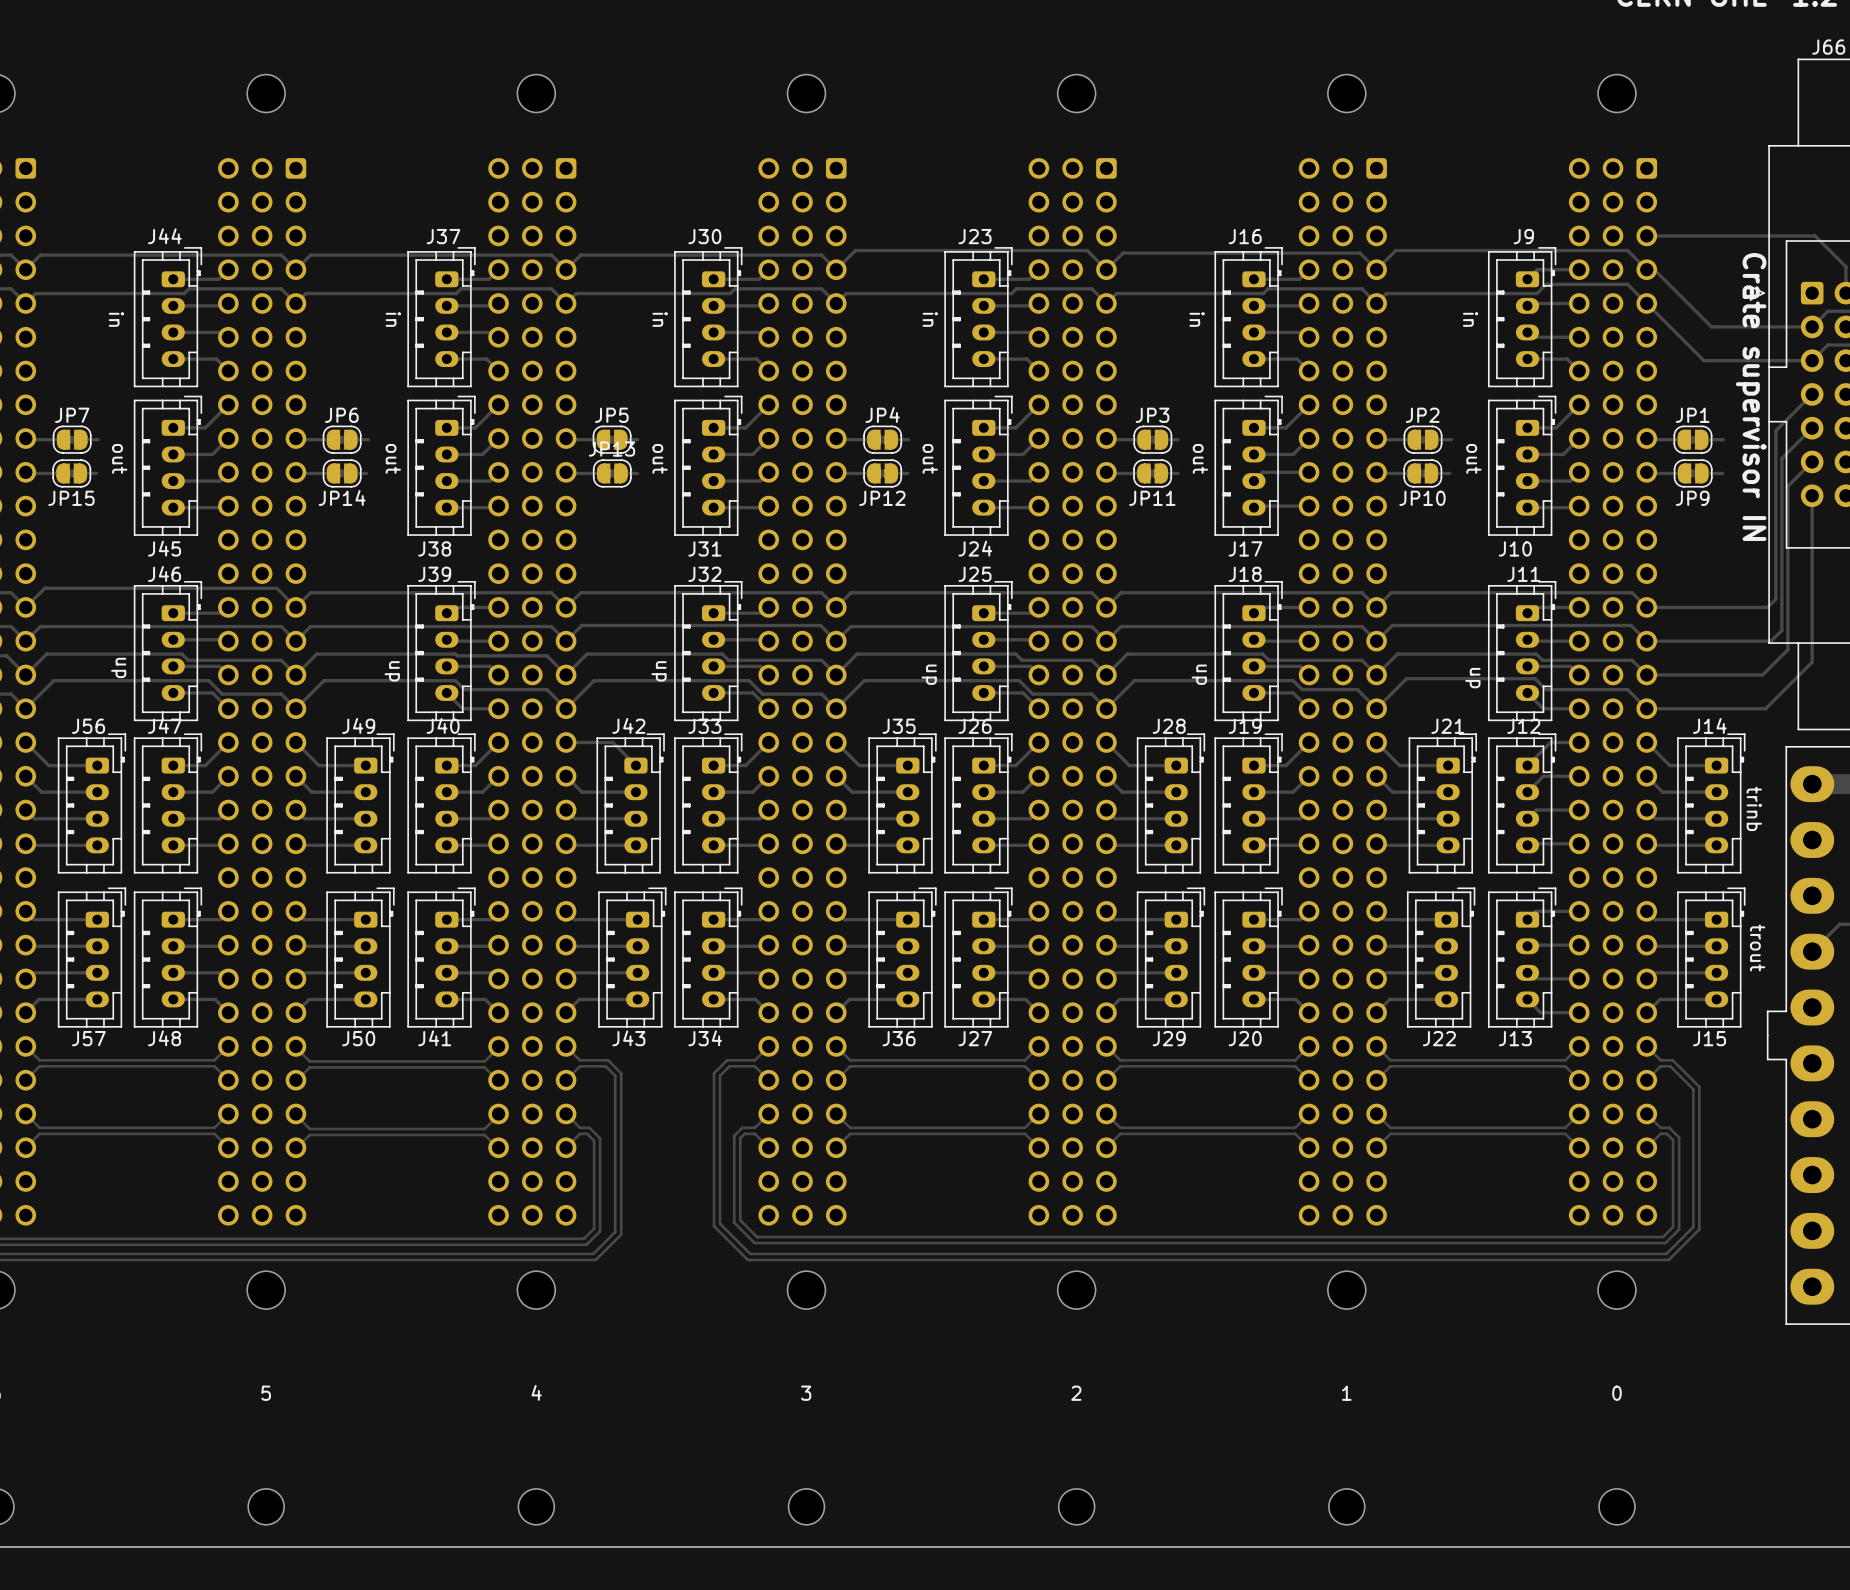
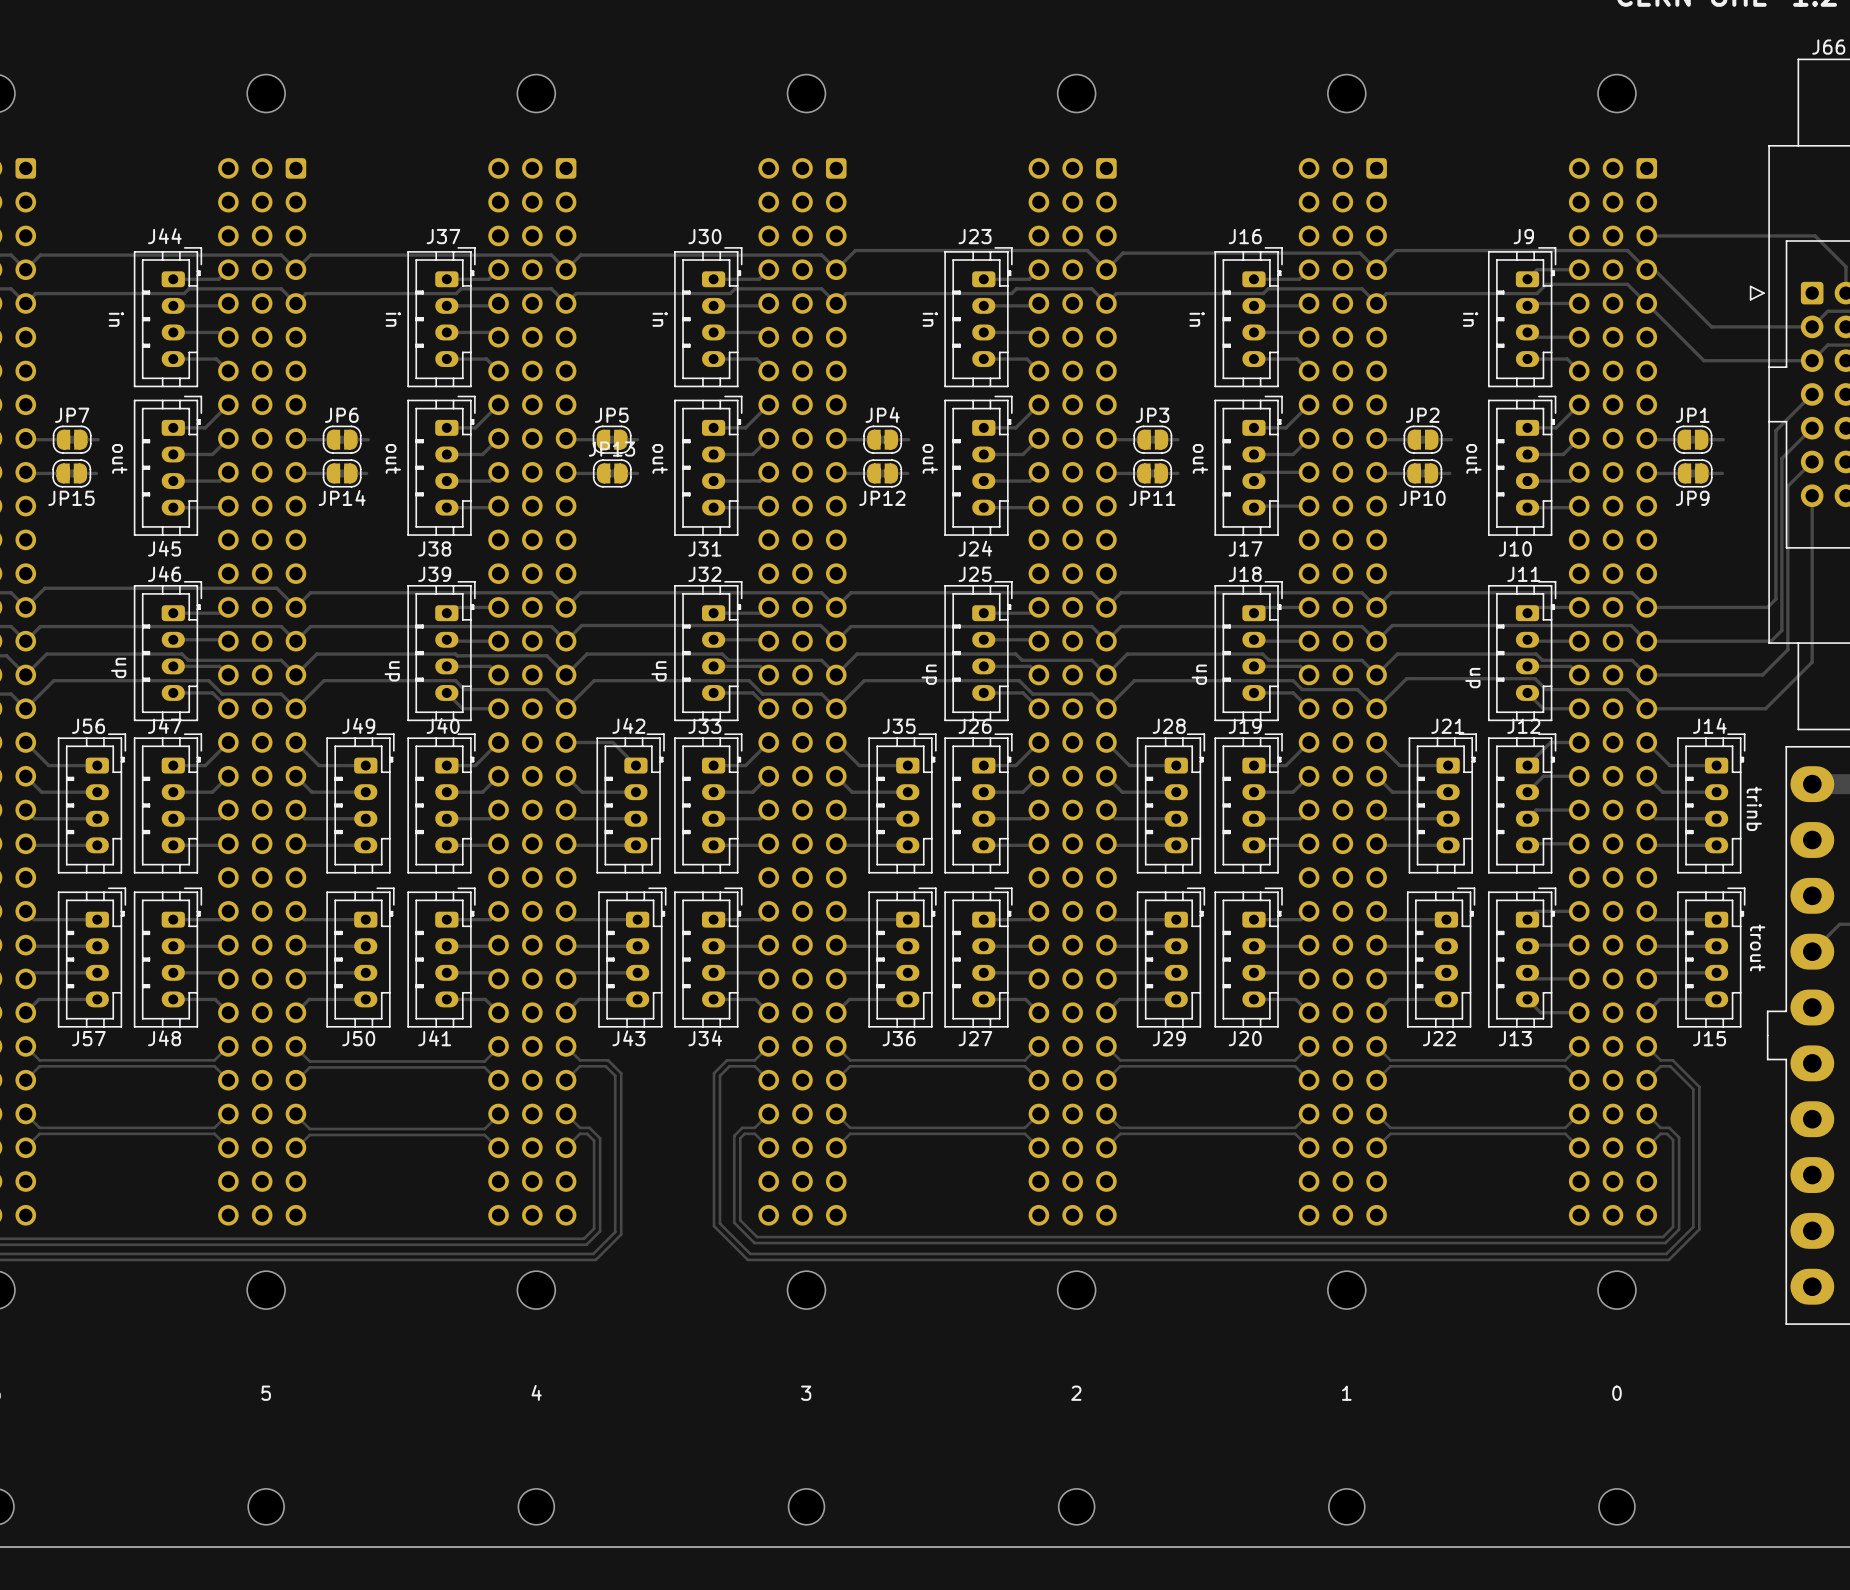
text: Crate supervisor IN (1751, 397) -> none

